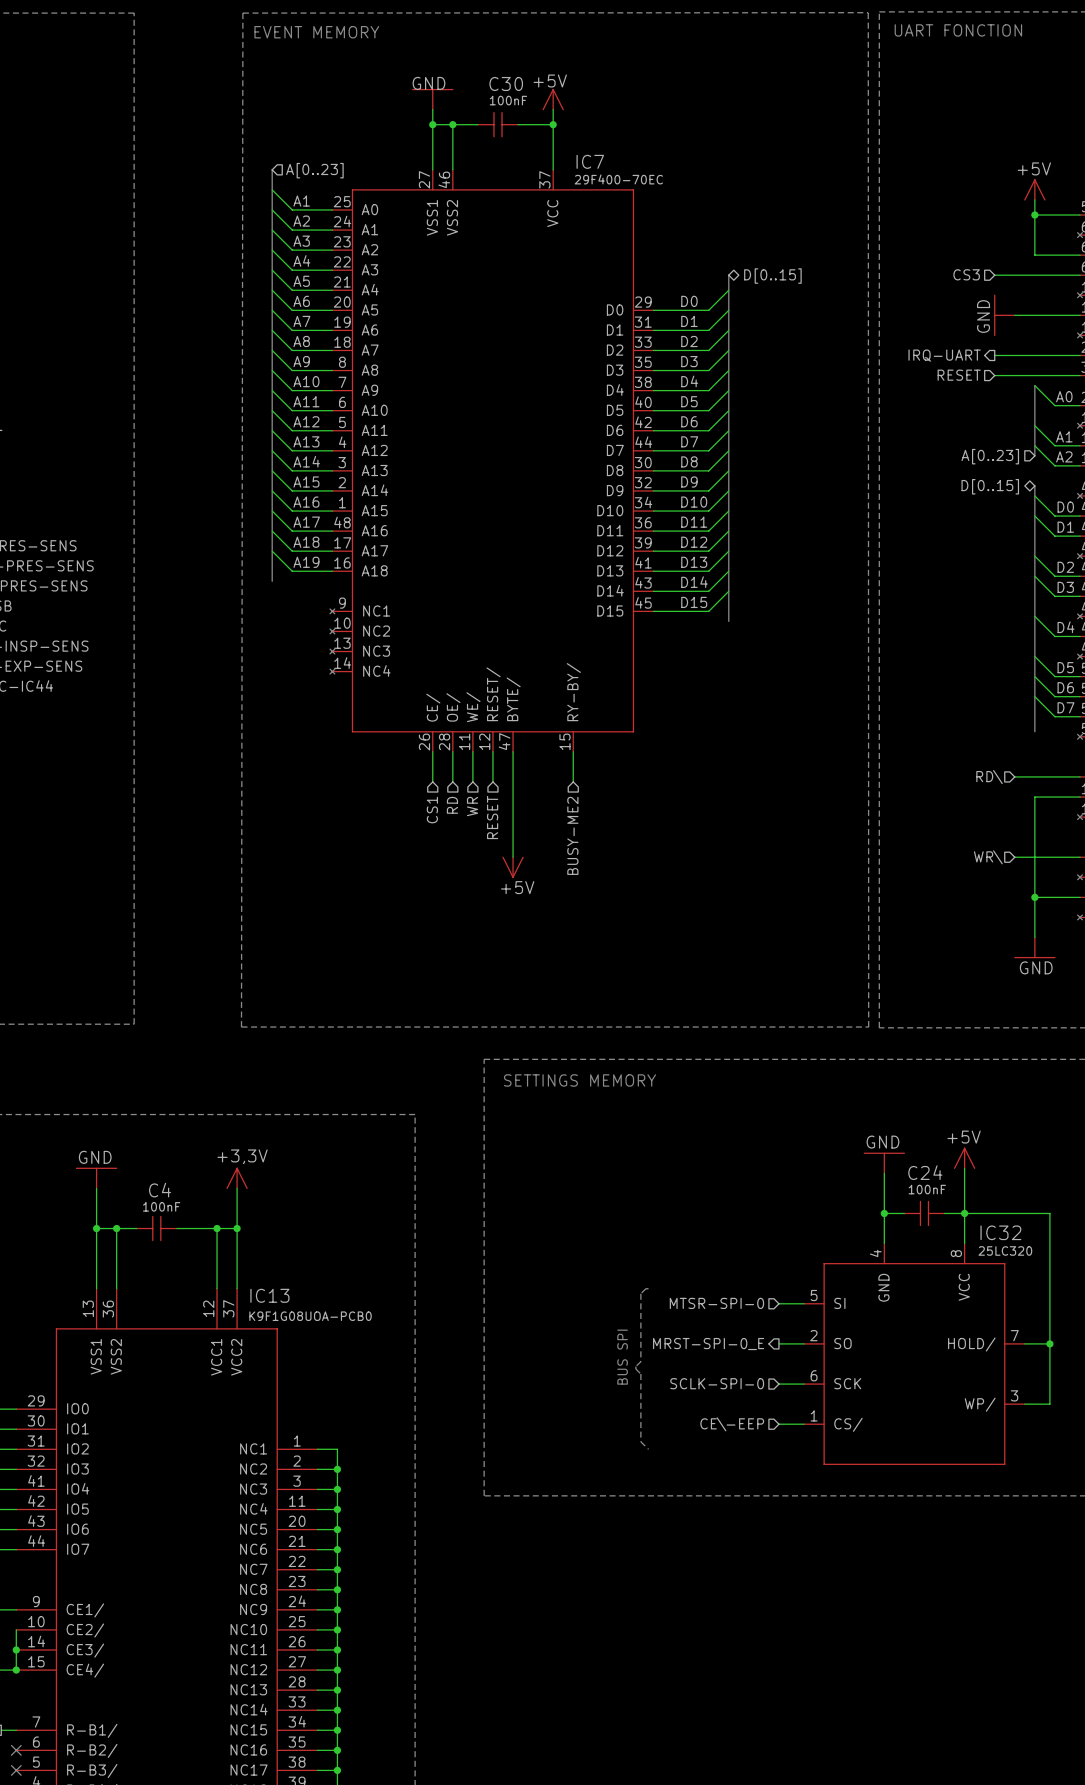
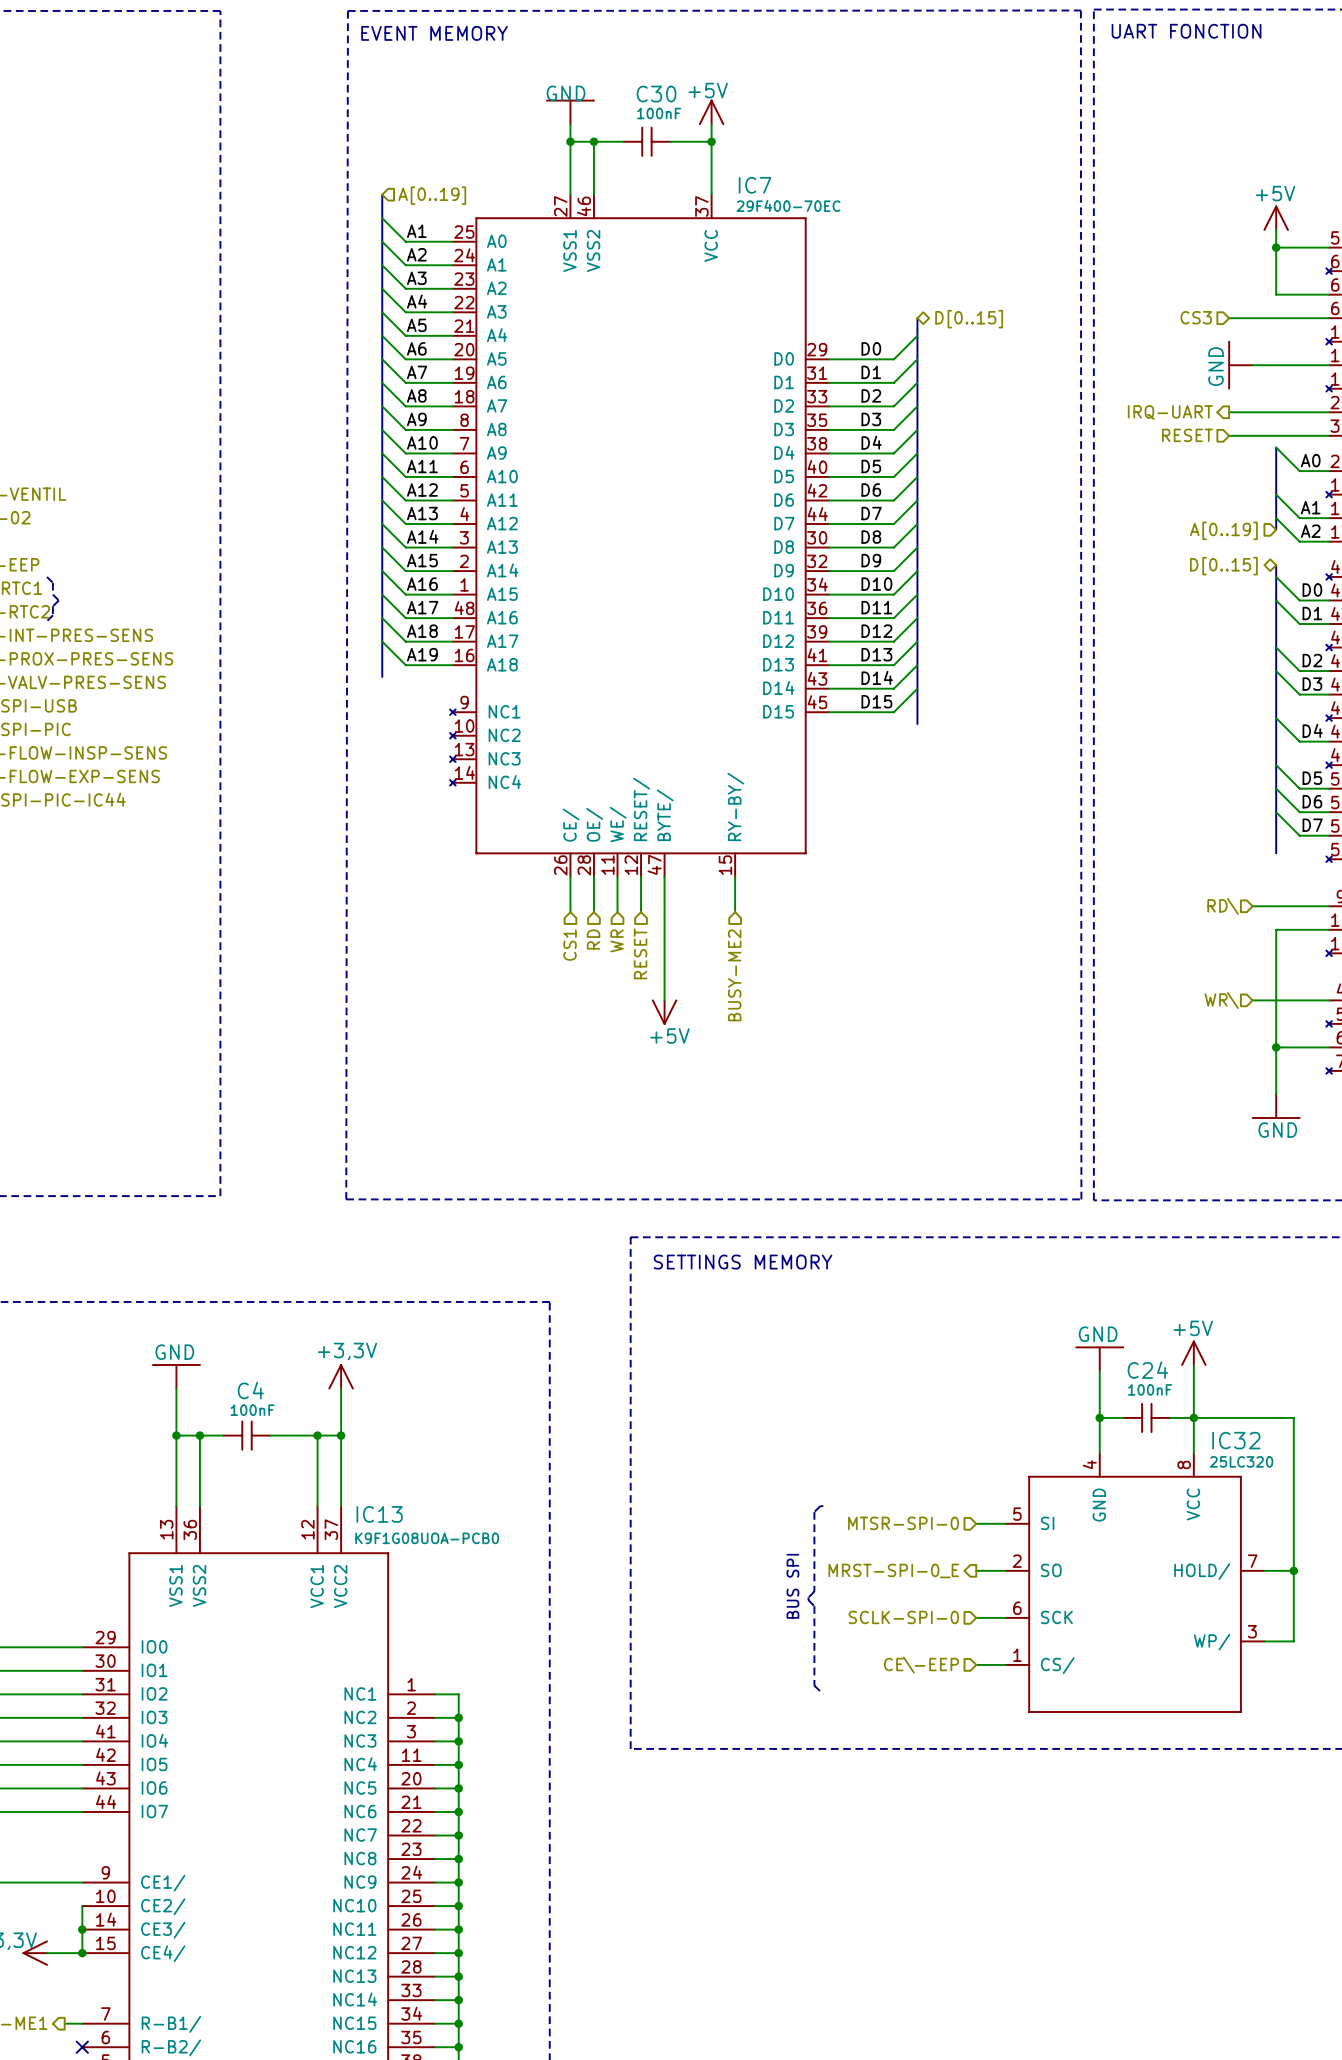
hierarchical label: A[0..23] (314, 170) -> A[0..19] (432, 195)
hierarchical label: A[0..23] (990, 456) -> A[0..19] (1223, 530)

